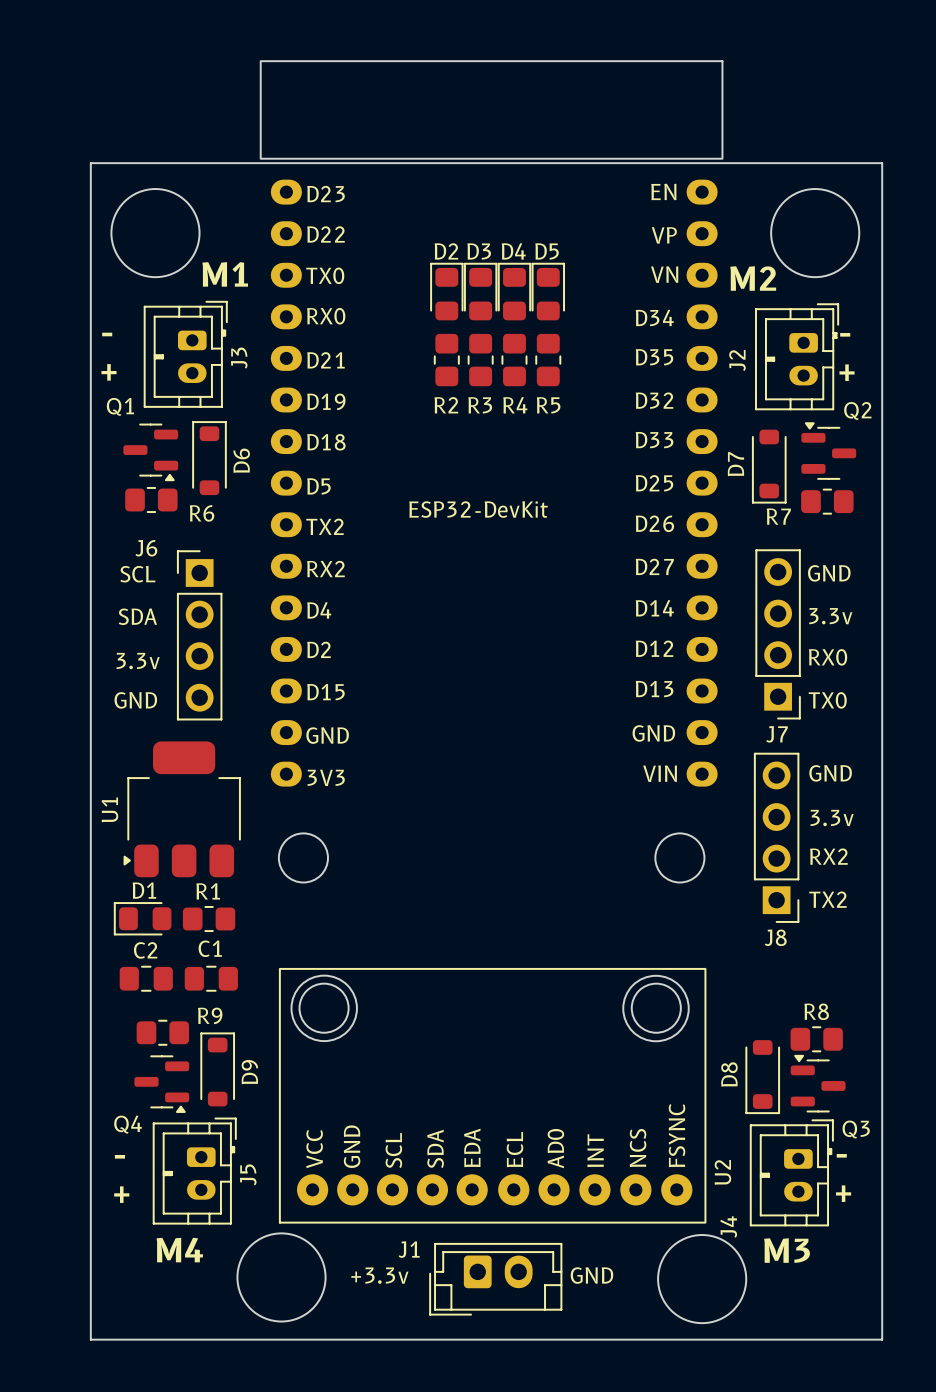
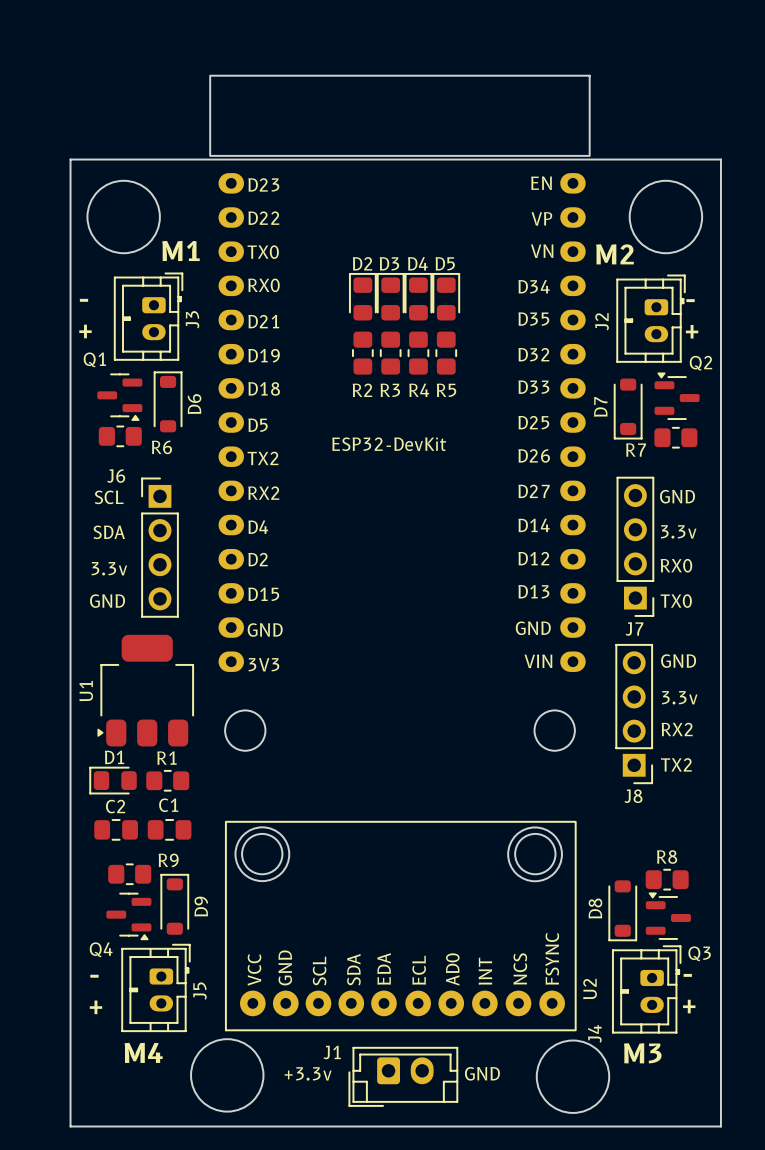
D2 position: (446, 291) -> (362, 296)
D3 position: (480, 291) -> (390, 296)
D4 position: (514, 291) -> (418, 296)
D5 position: (548, 291) -> (446, 296)
R2 position: (446, 360) -> (362, 353)
R3 position: (480, 360) -> (390, 353)
R4 position: (514, 360) -> (418, 353)
R5 position: (548, 360) -> (446, 353)

